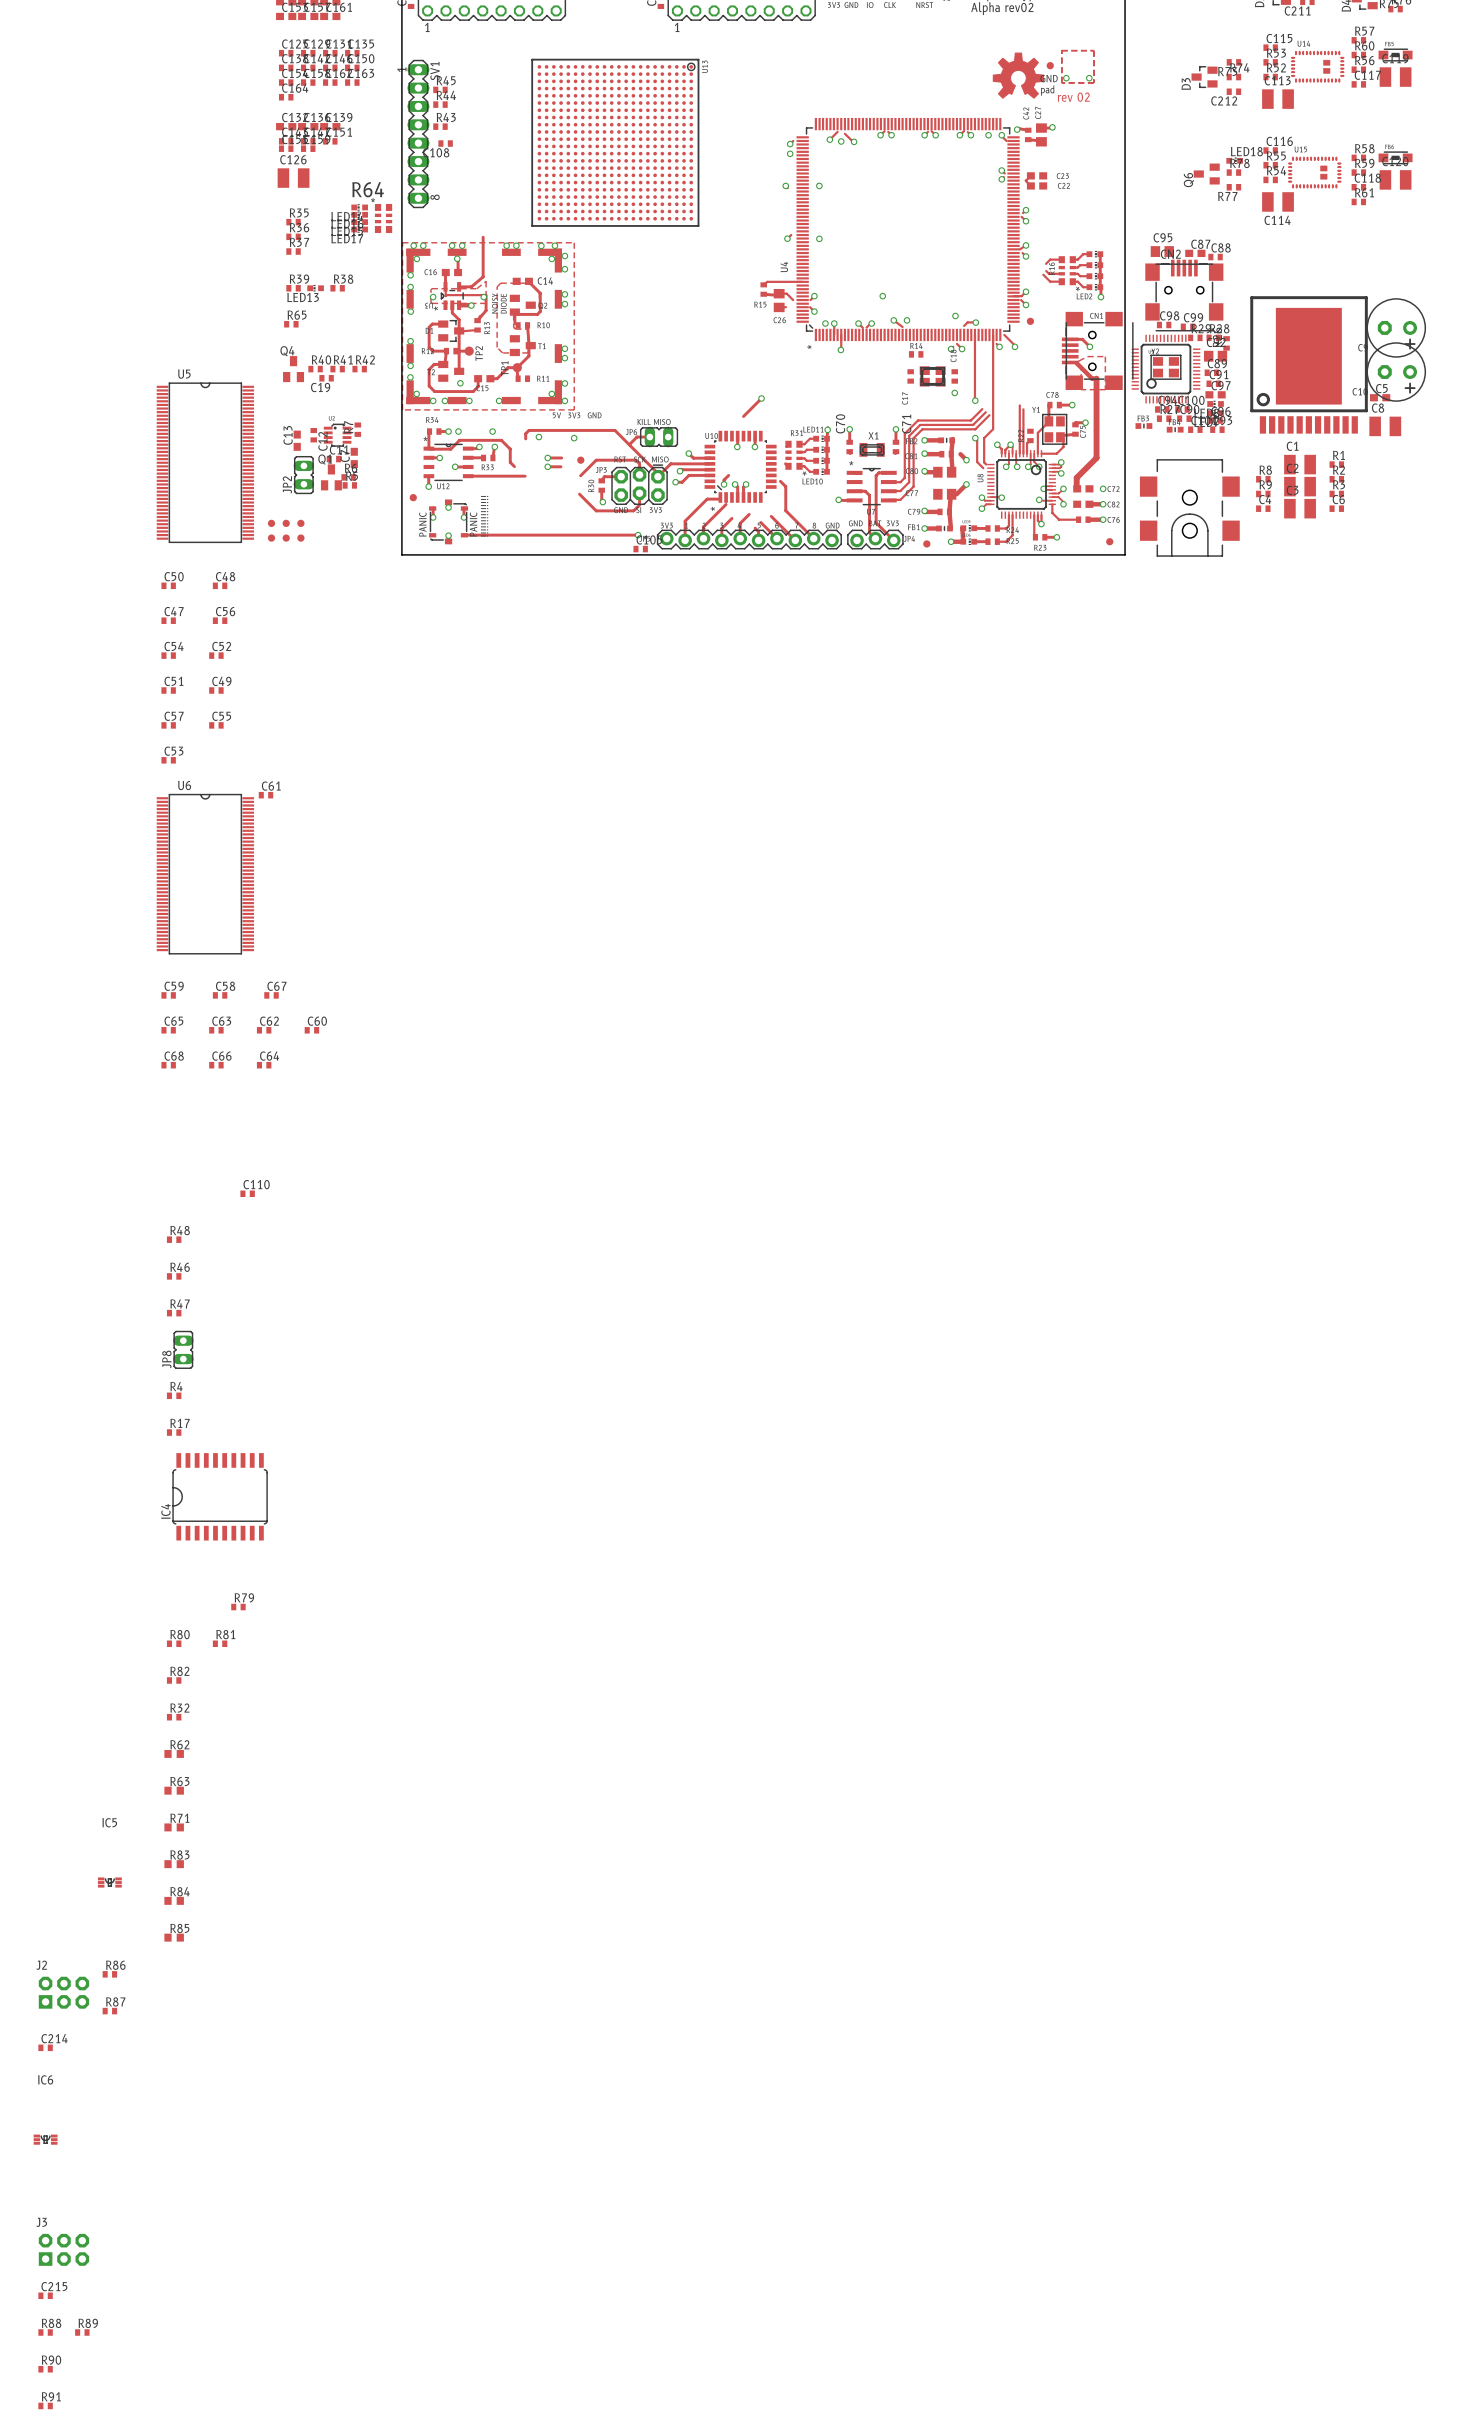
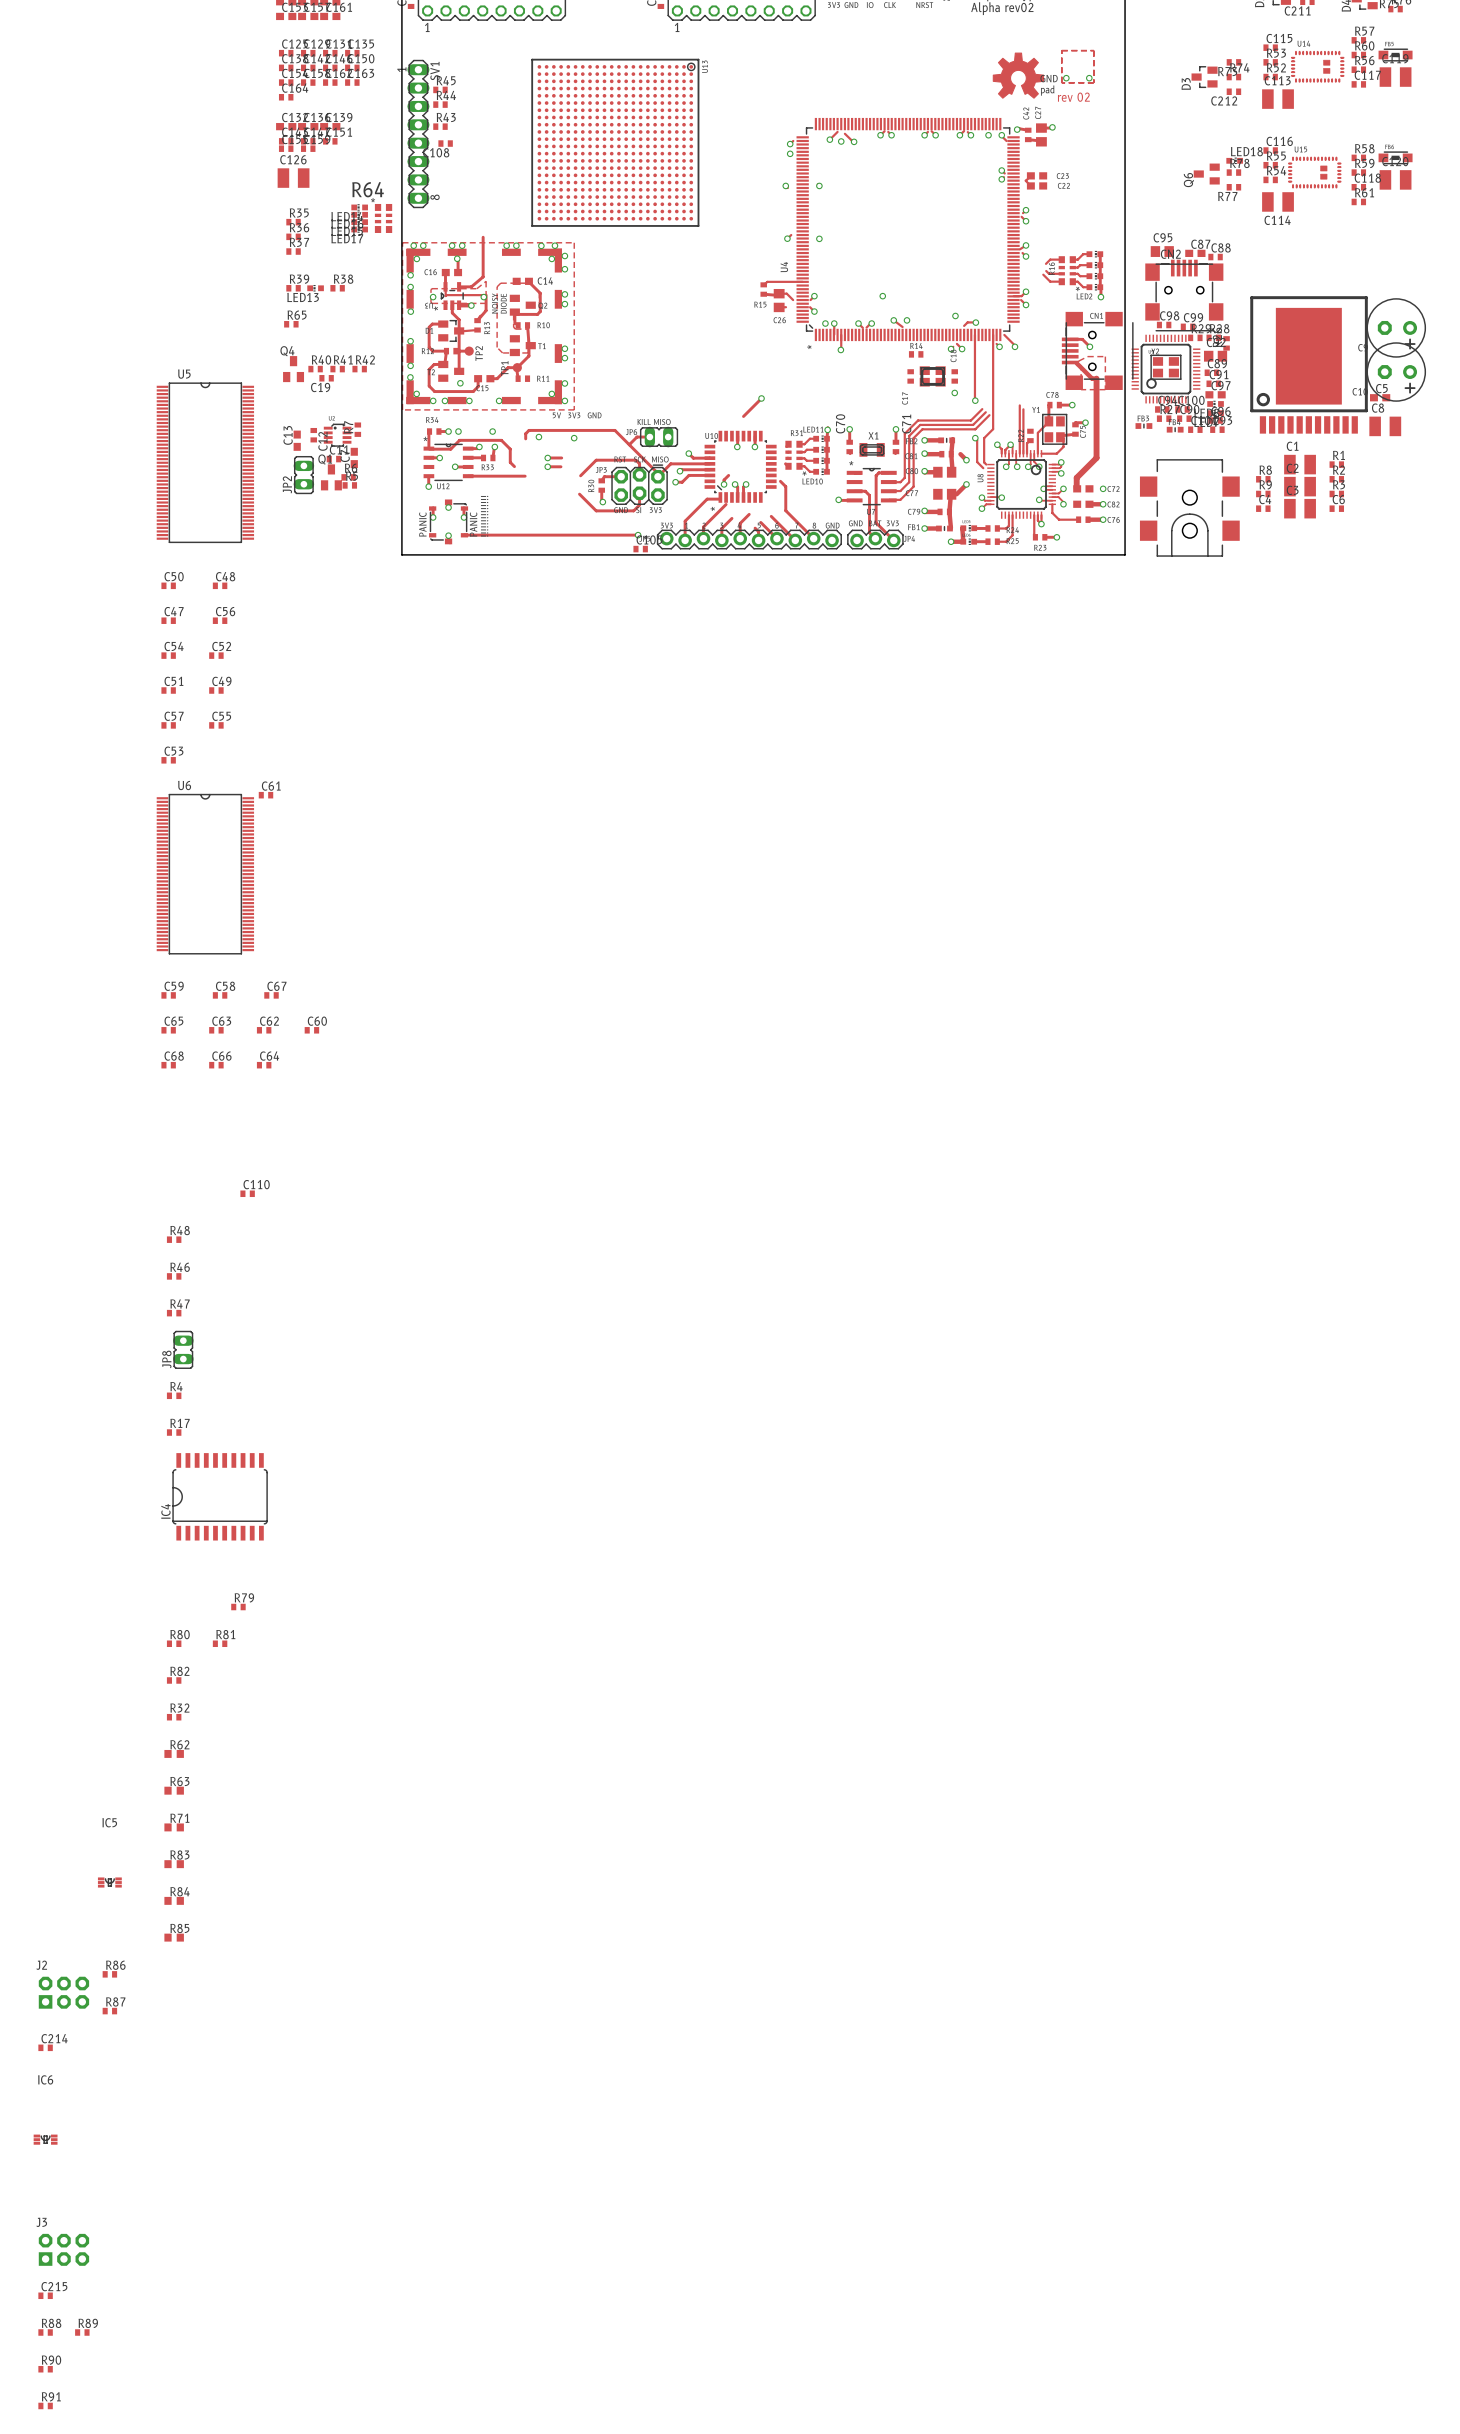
part: (1050, 65) -> none
part: (1030, 321) -> none
part: (580, 460) -> none
part: (413, 497) -> none
part: (271, 523) -> none
part: (286, 523) -> none
part: (300, 523) -> none
part: (271, 538) -> none
part: (286, 538) -> none
part: (300, 538) -> none
part: (1109, 541) -> none
part: (926, 543) -> none

